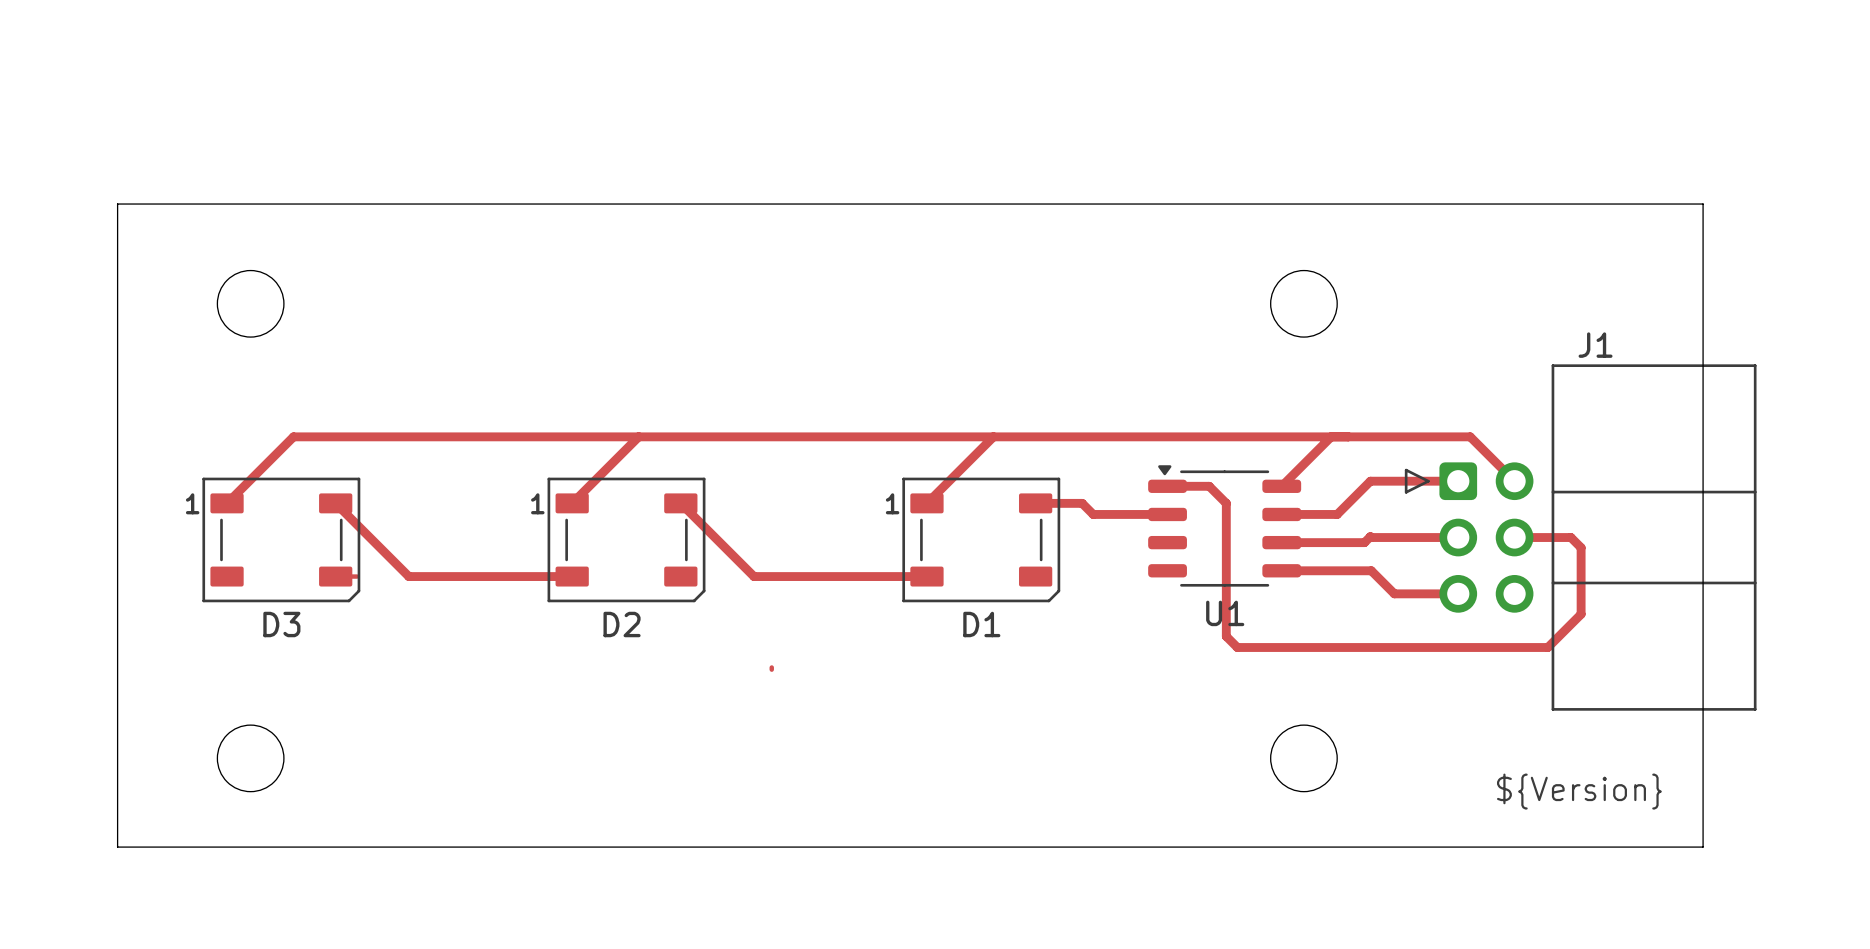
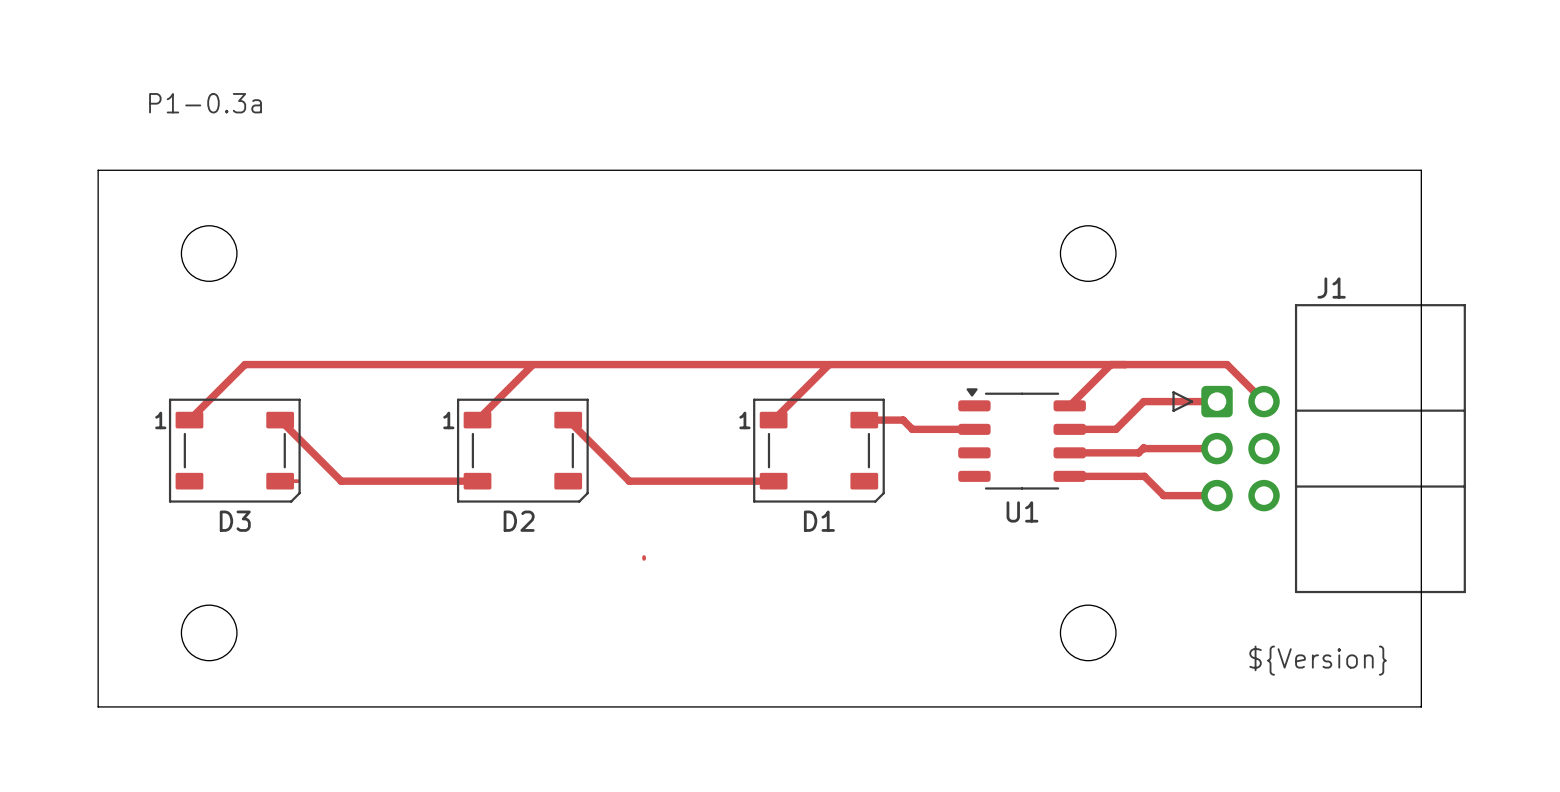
text: none -> P1-0.3a (205, 103)
track: (1167, 486) (1209, 486) (1226, 503) (1226, 636) (1237, 647) (1547, 647) (1581, 614) (1581, 547) (1570, 537) (1514, 537) -> none

